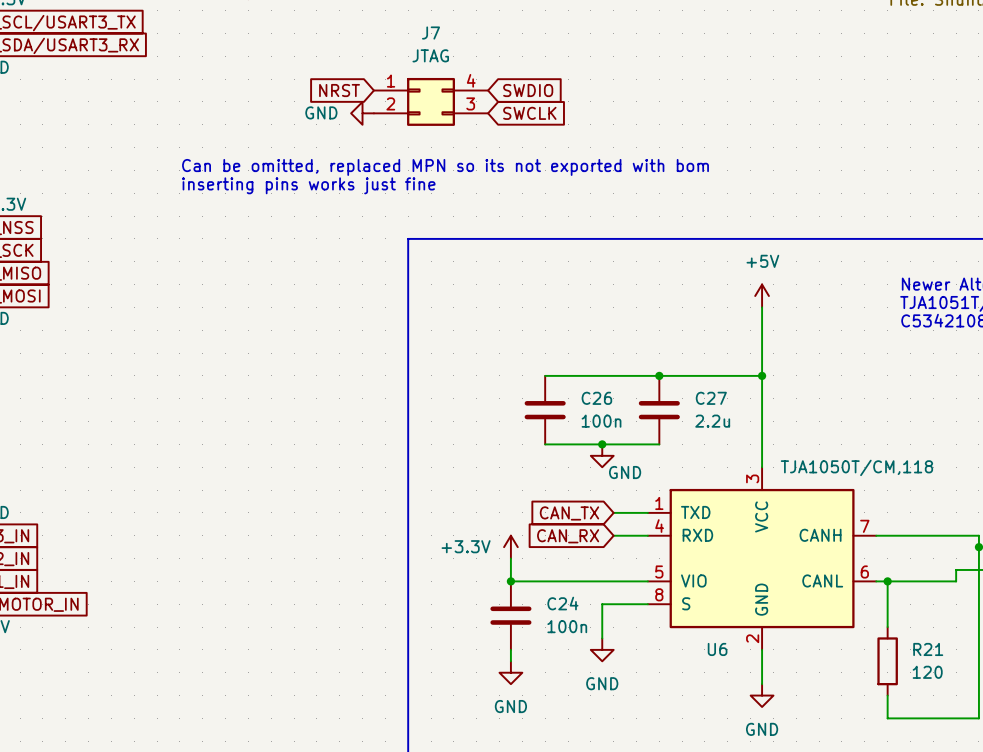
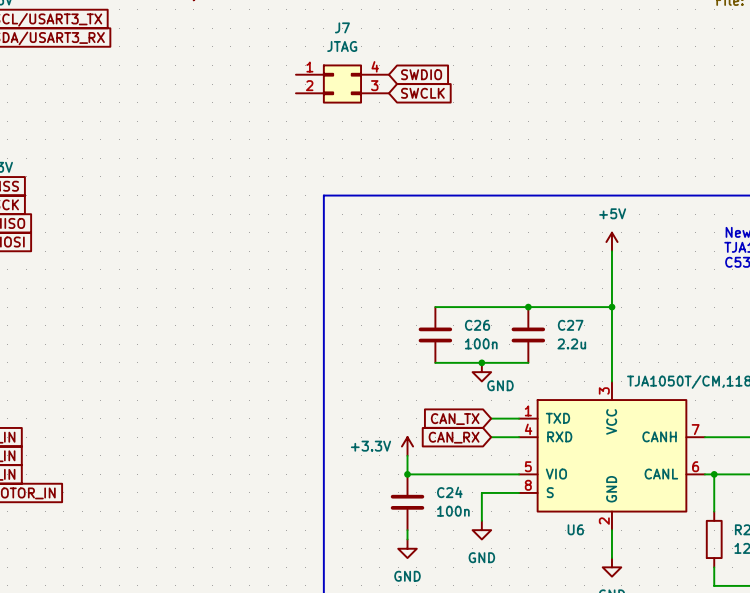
global label: NRST (339, 90) -> none
power symbol: GND (362, 113) -> none
text: Can be omitted, replaced MPN so its not exported with bom (445, 167) -> none
text: inserting pins works just fine (308, 185) -> none

